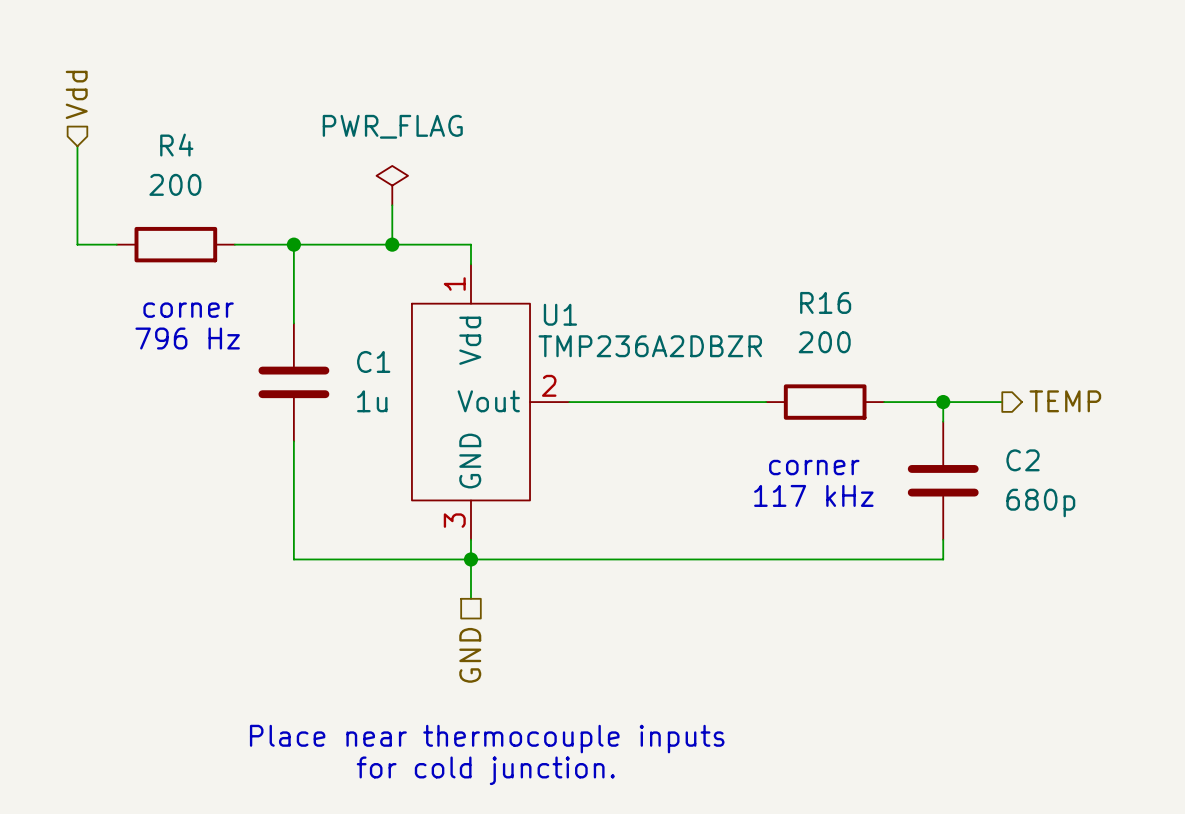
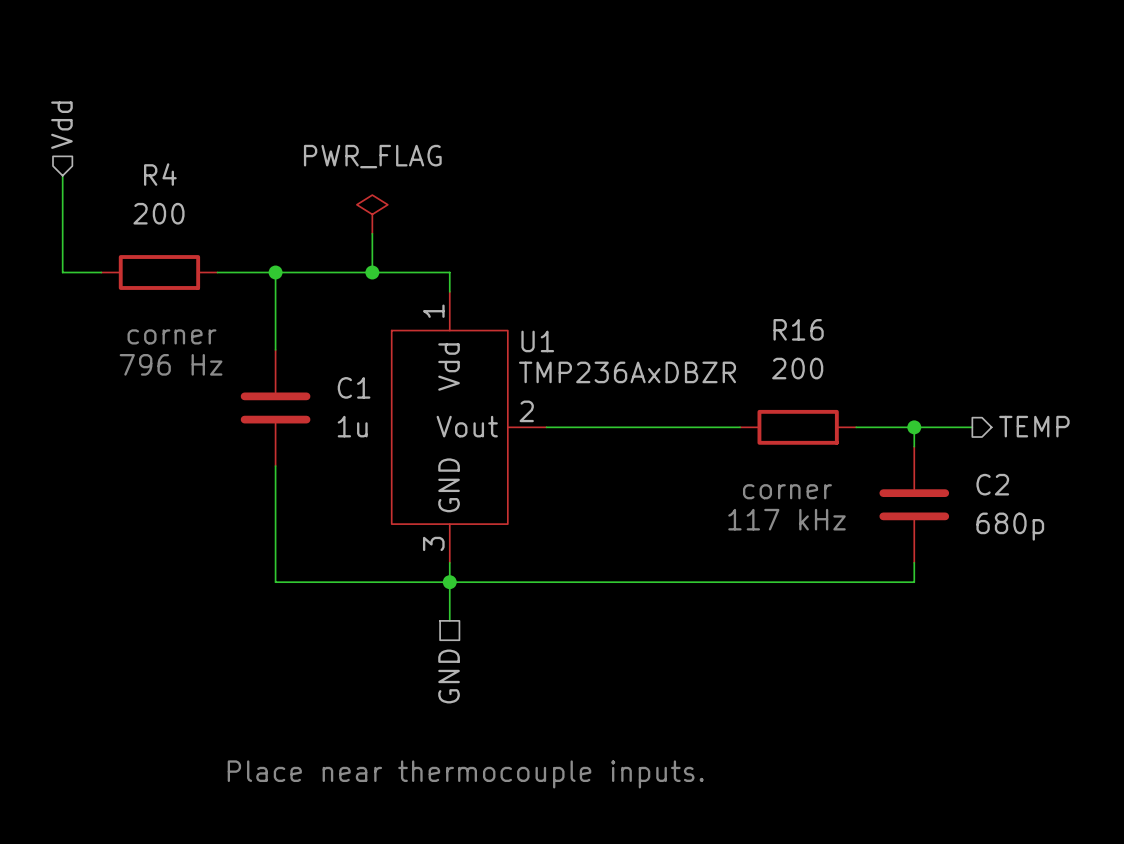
U1 value: TMP236A2DBZR (650, 346) -> TMP236AxDBZR (627, 372)
text: Place near thermocouple inputs (487, 739) -> Place near thermocouple inputs. (465, 774)
text: for cold junction. (485, 770) -> none

